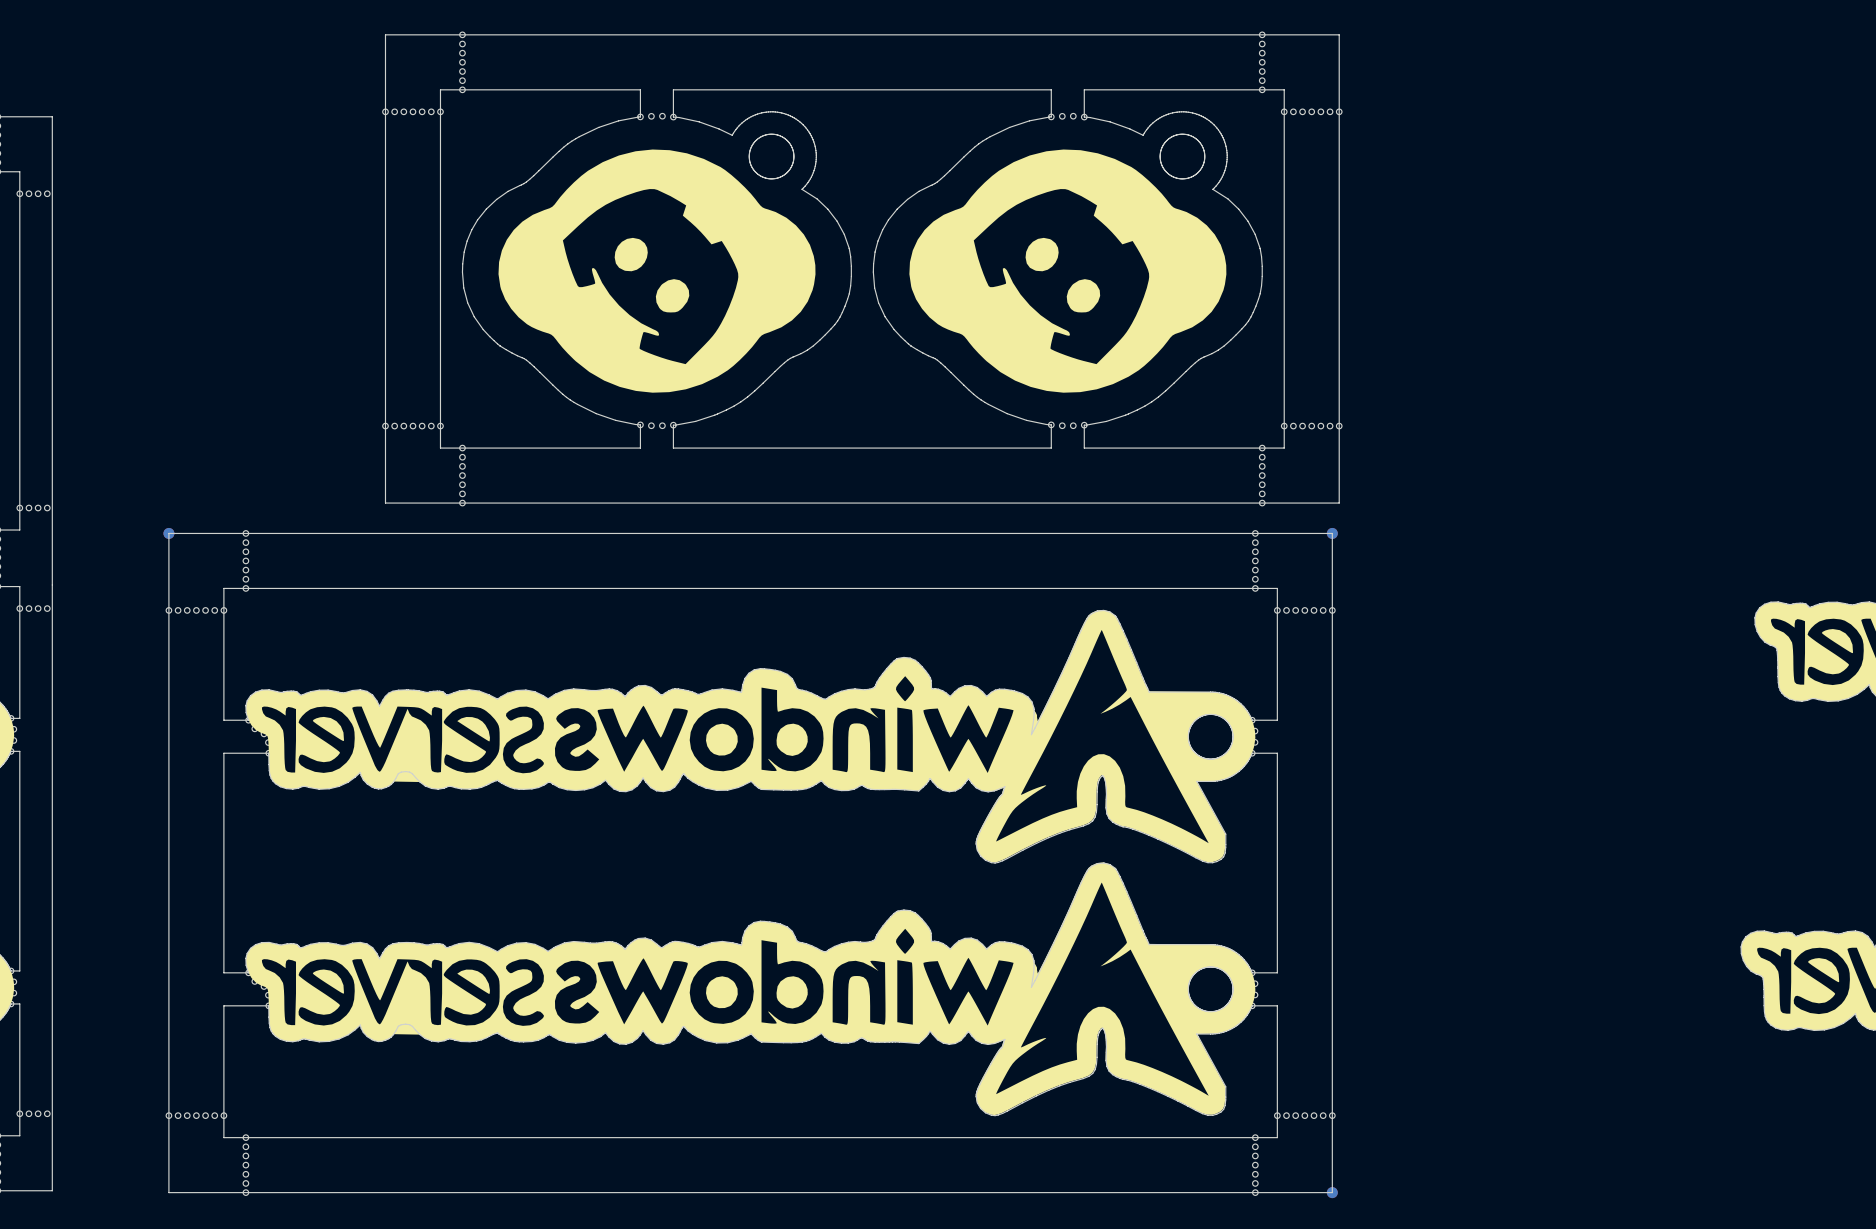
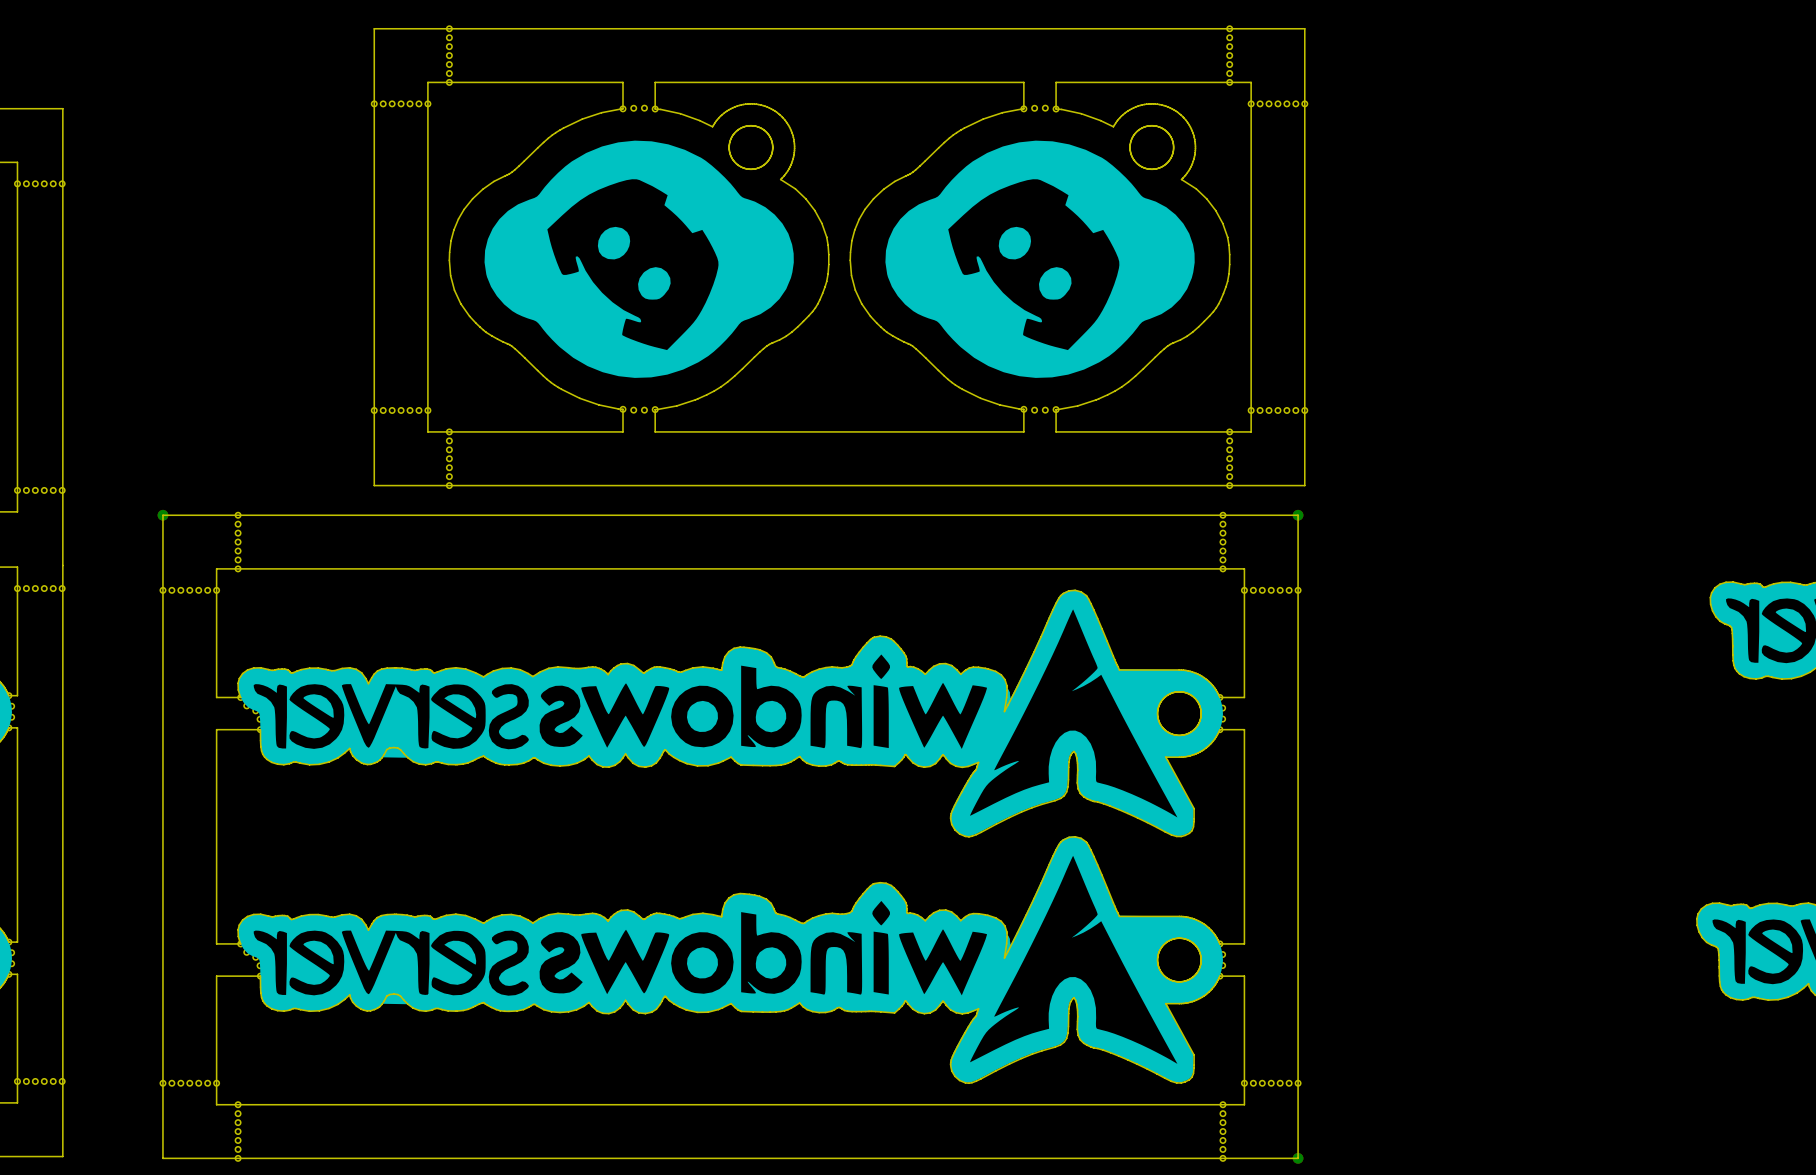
board edge: (52, 116) (52, 1190) -> (49, 108) (62, 108) (62, 1156) (49, 1156)
part: none -> (53, 183)
part: none -> (62, 183)
part: none -> (53, 490)
part: none -> (62, 490)
part: none -> (53, 588)
part: none -> (62, 588)
part: none -> (53, 1081)
part: none -> (62, 1081)

